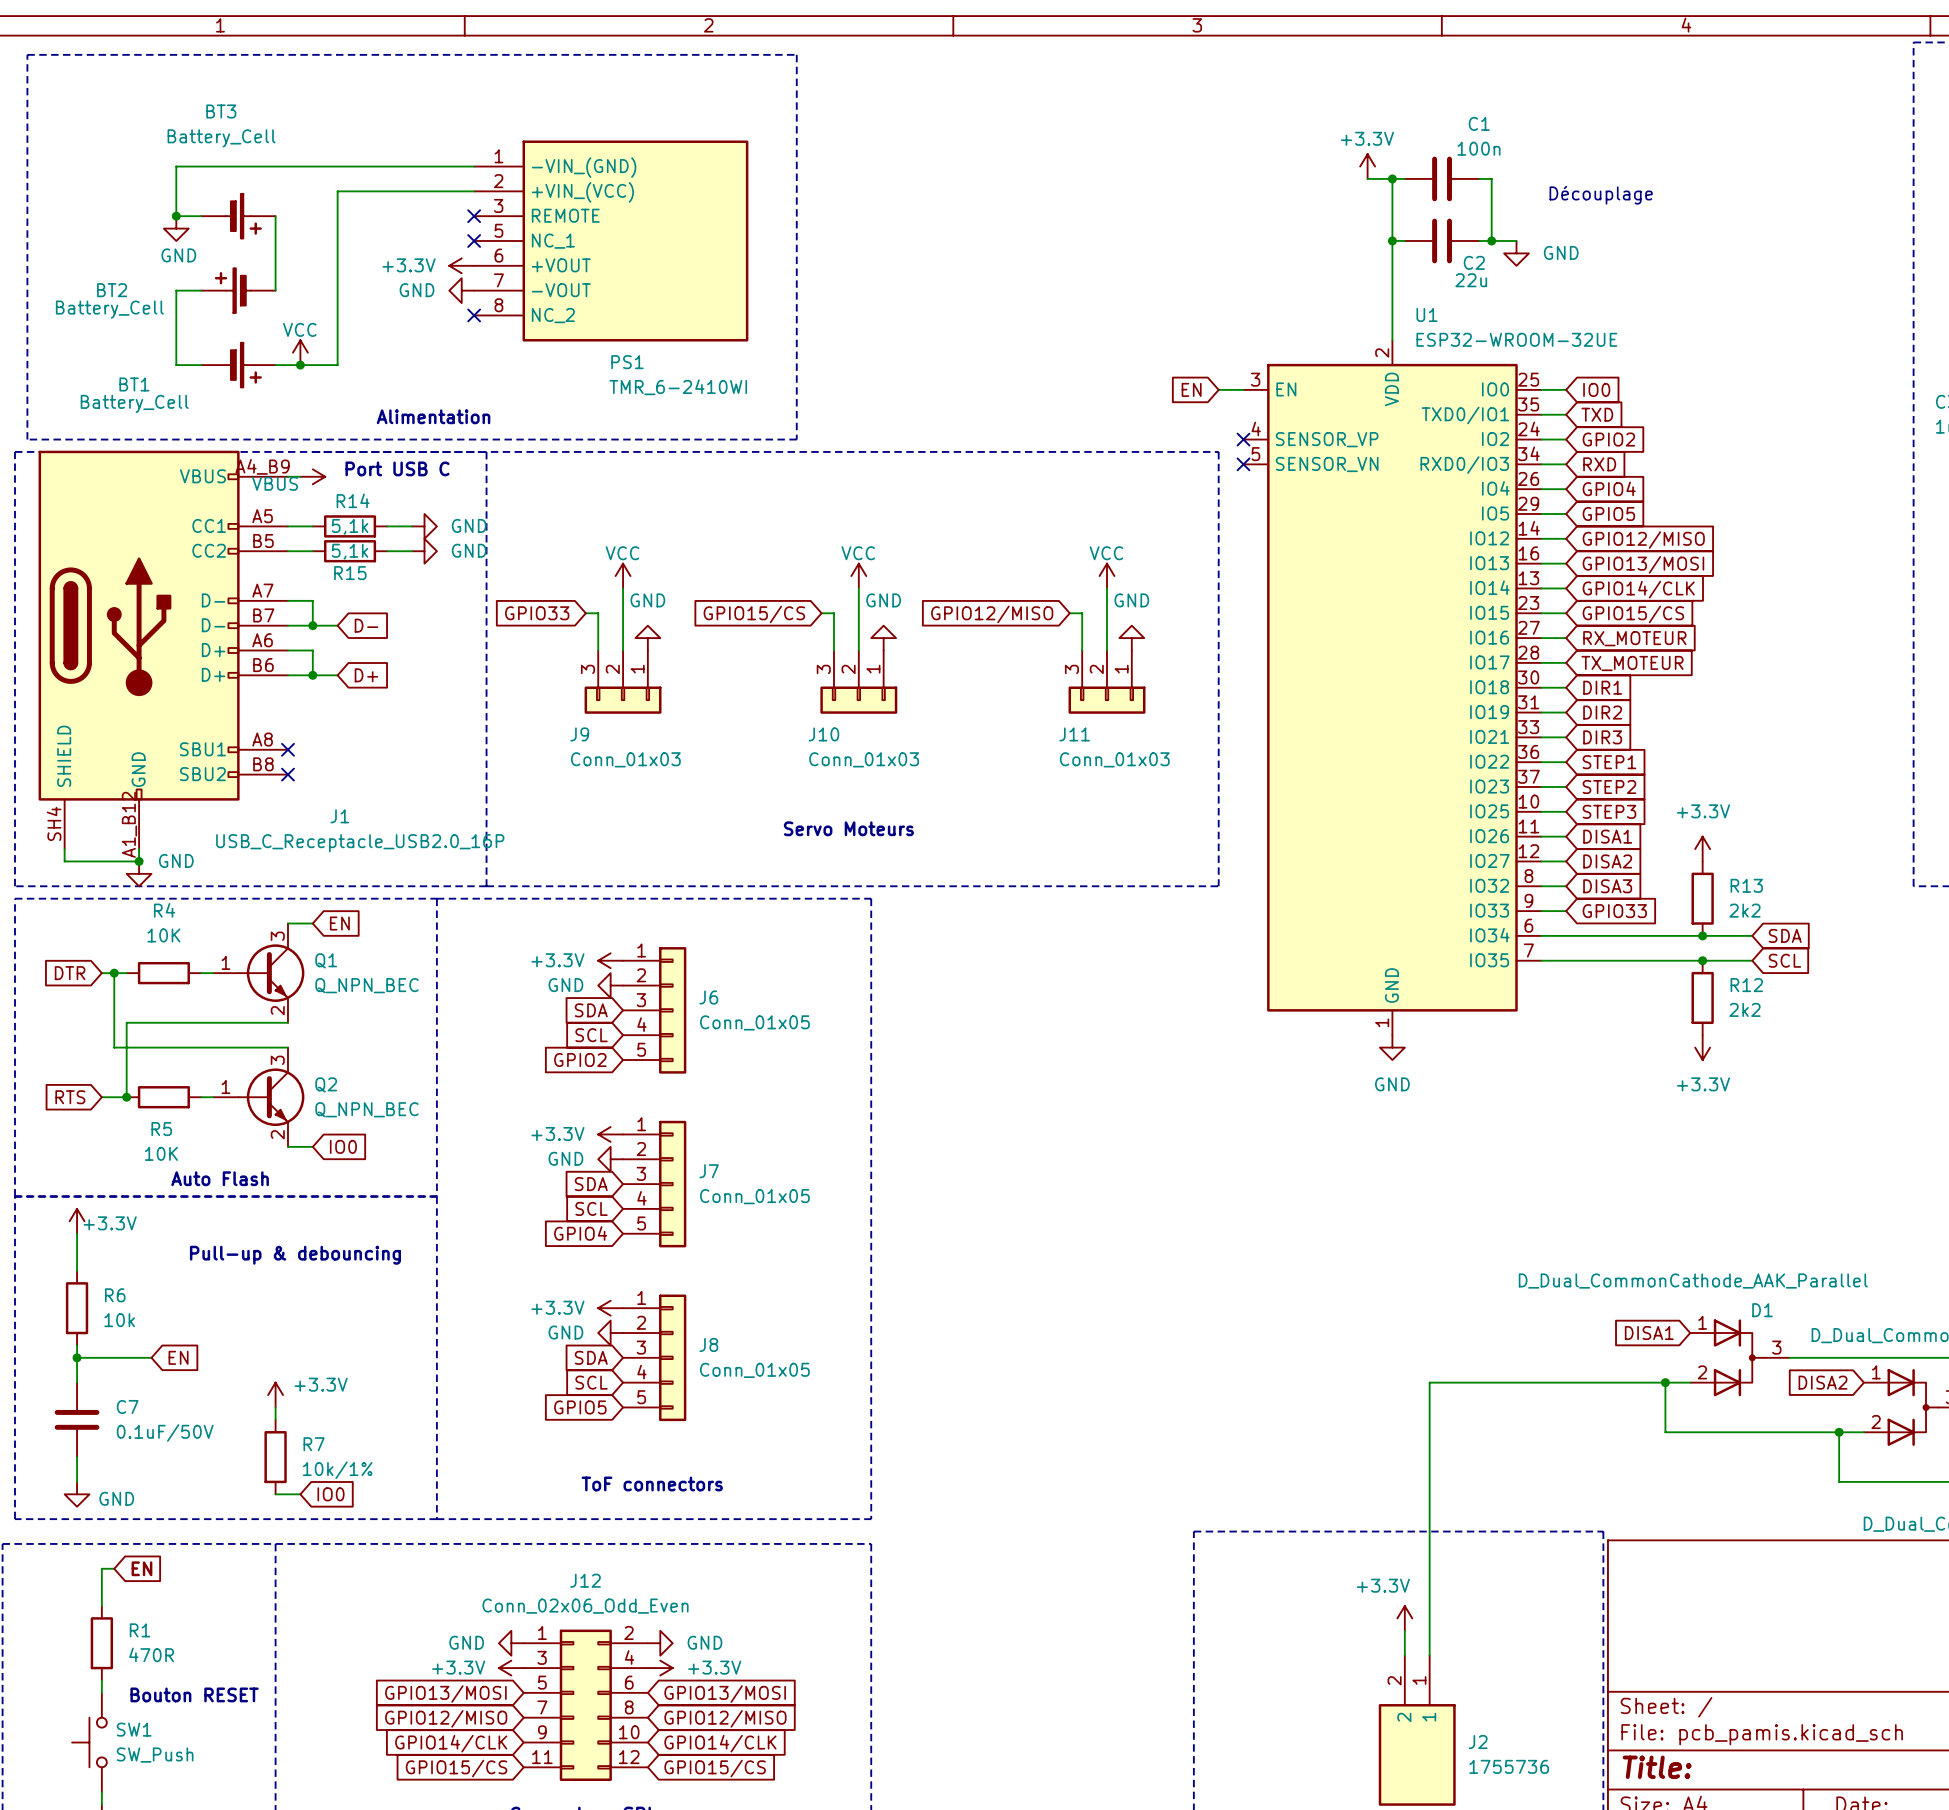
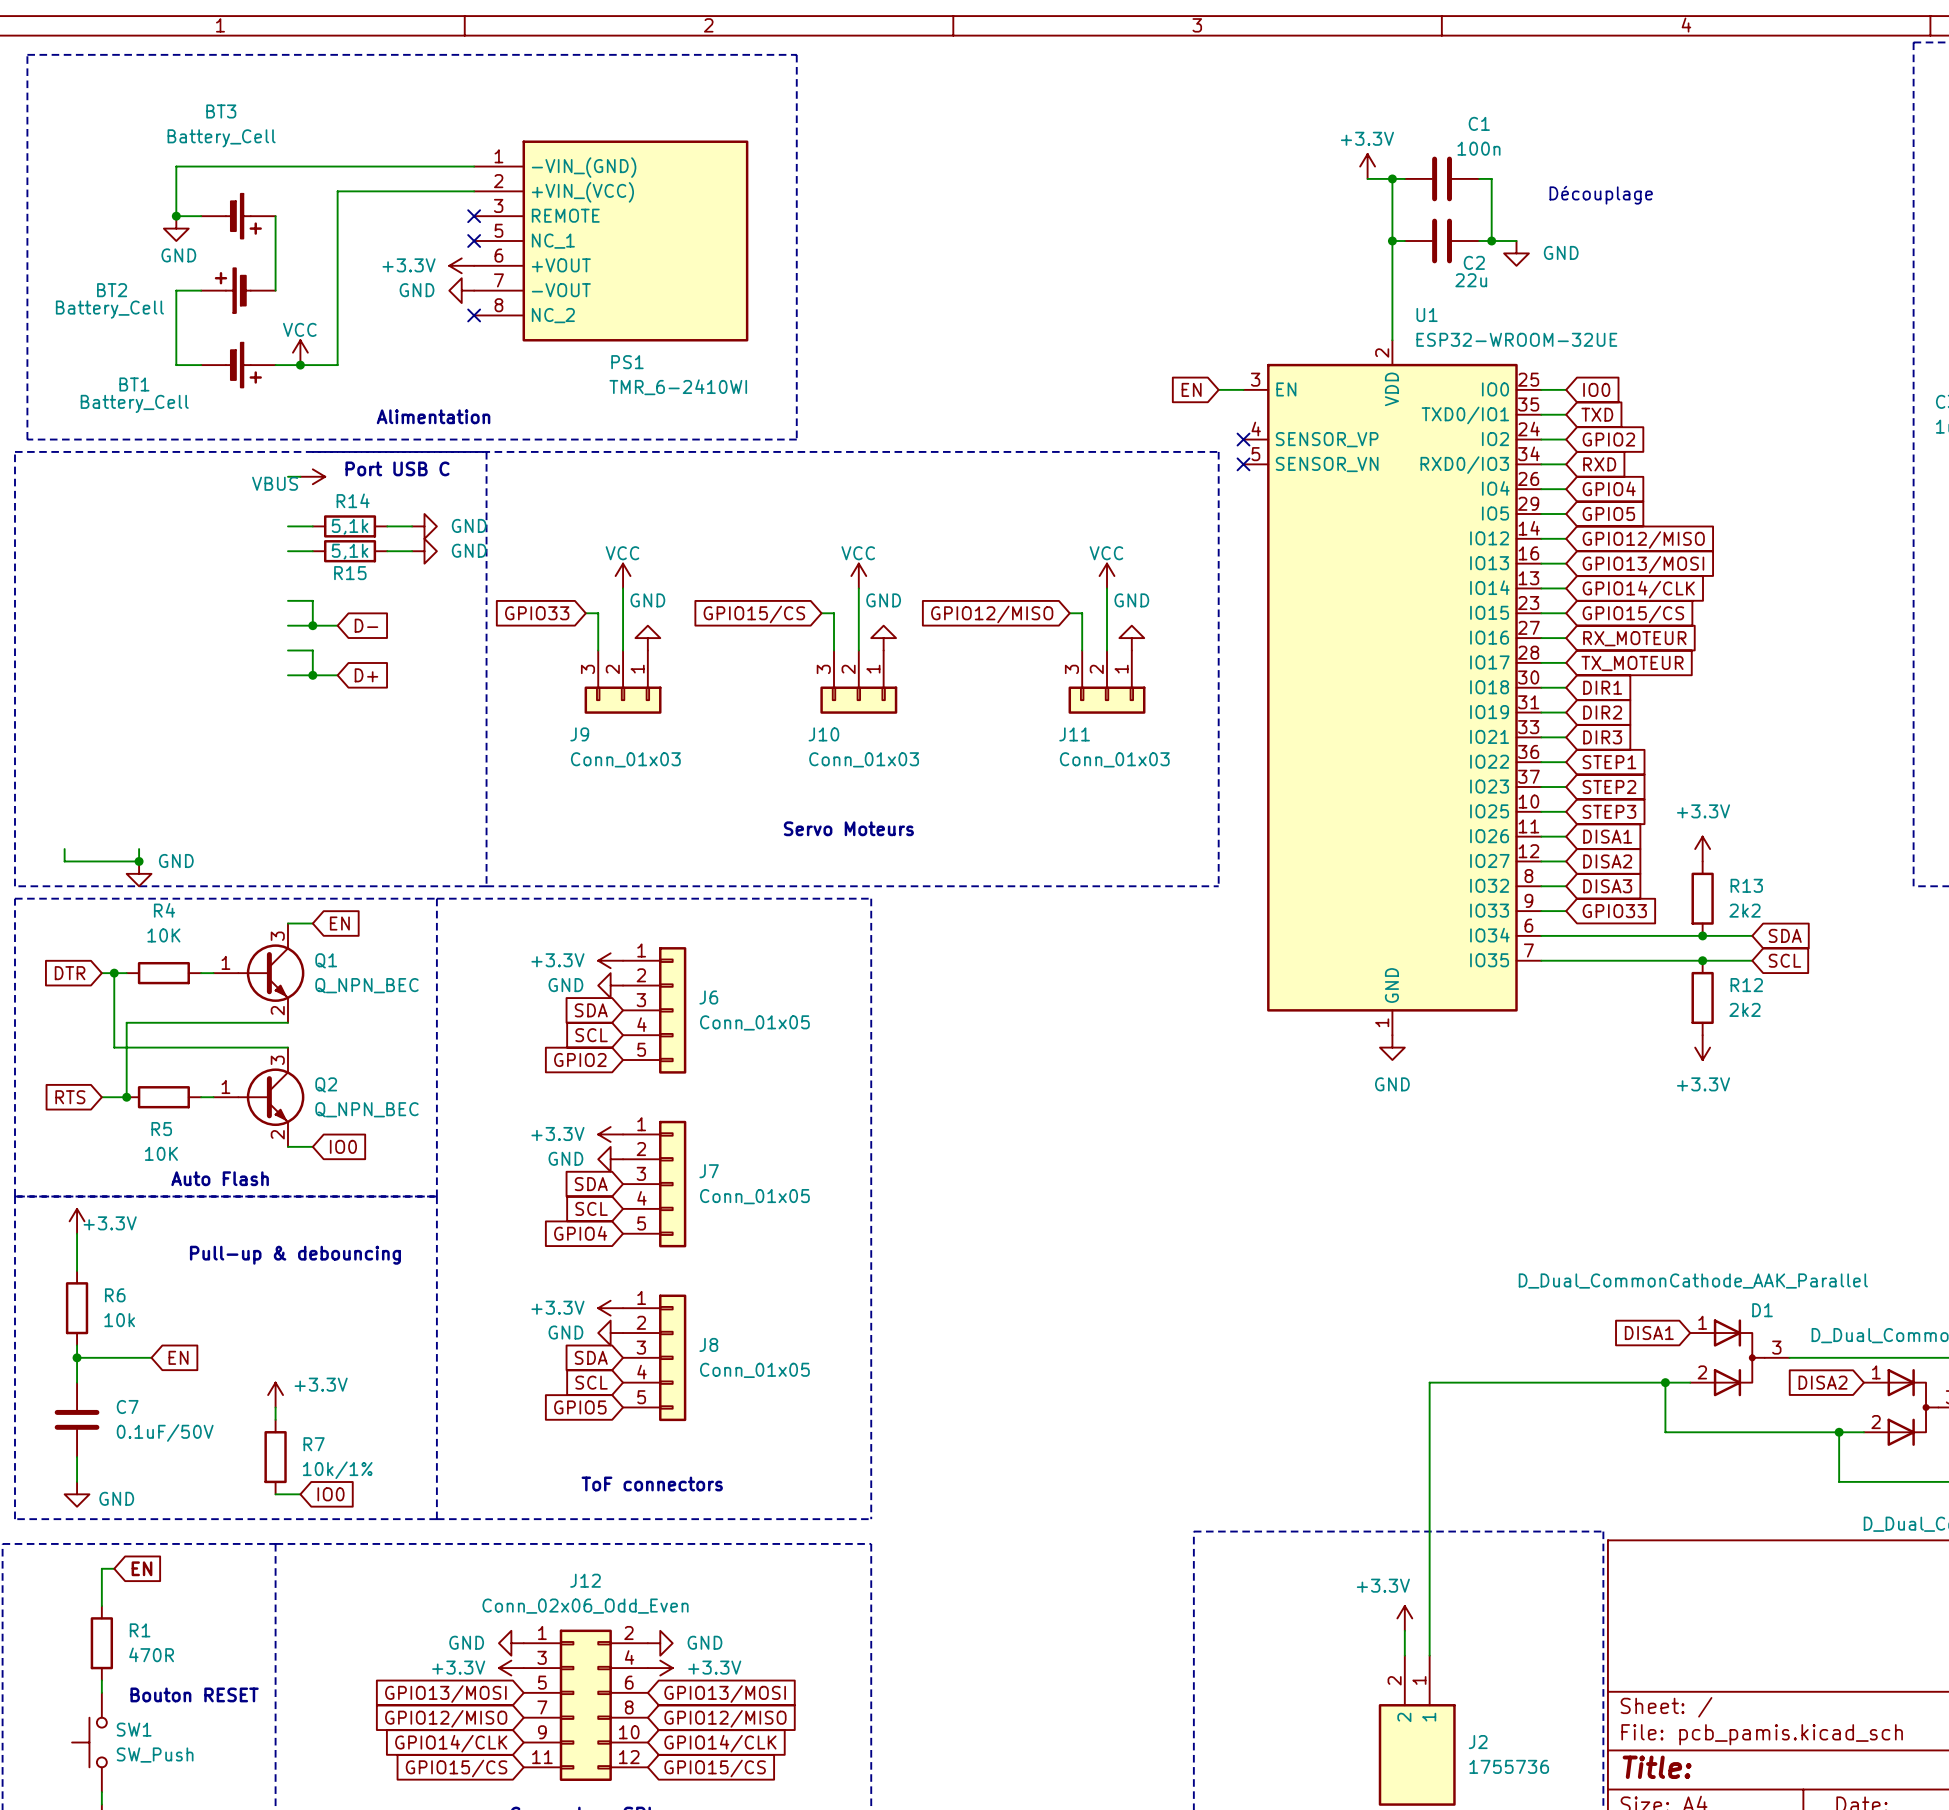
J1: USB_C_Receptacle_USB2.0_16P (163, 649) -> none
no-connect mark: (287, 749) -> none
no-connect mark: (287, 774) -> none

